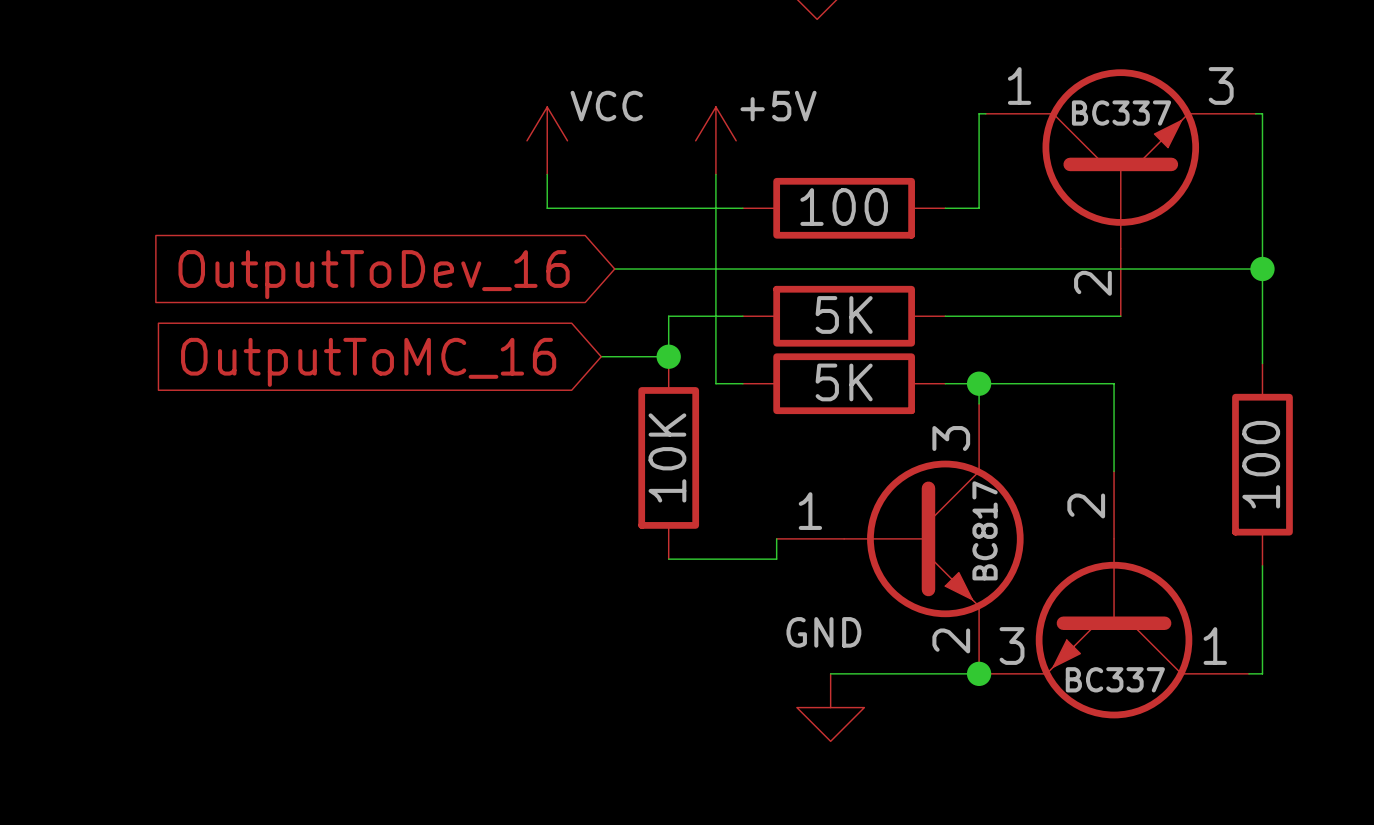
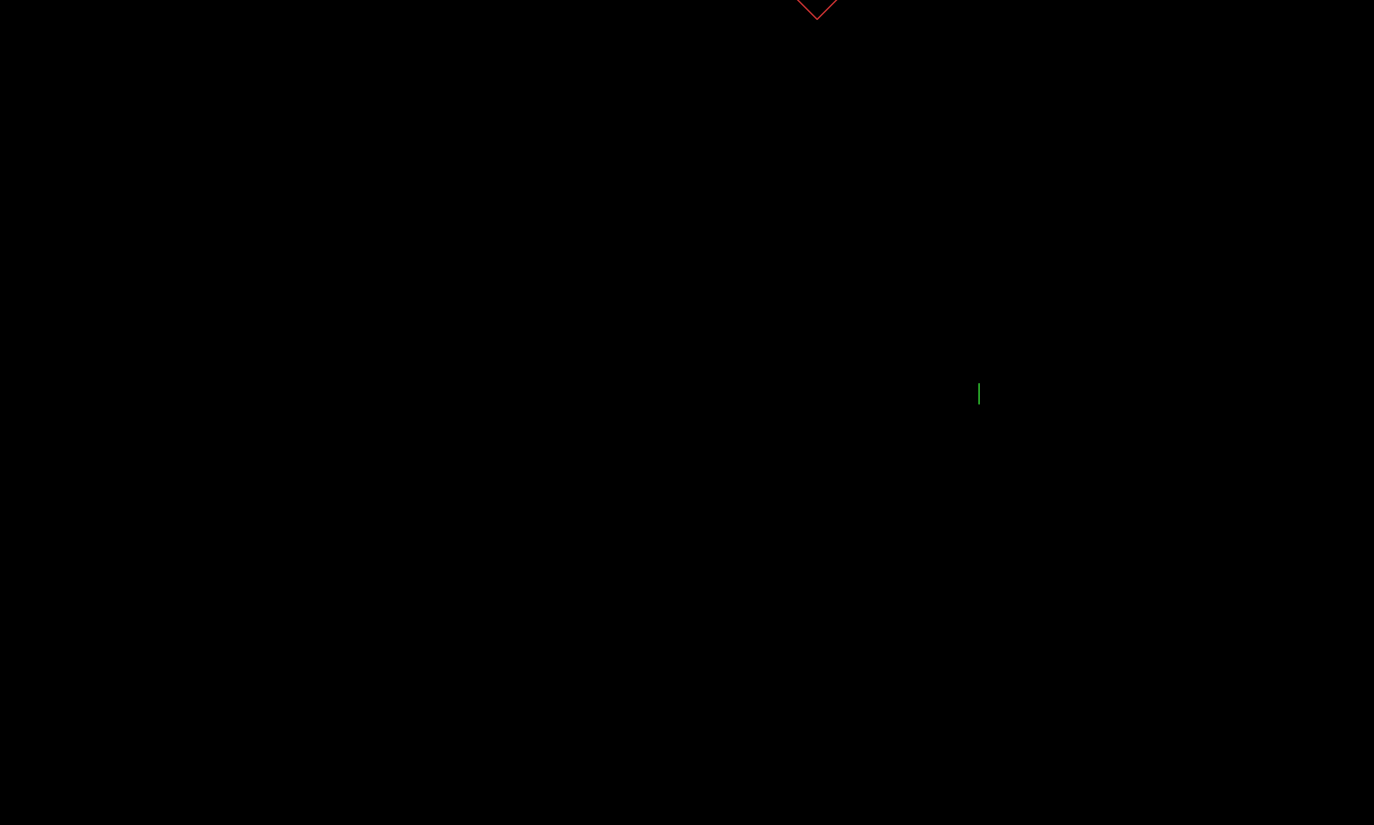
wire: (985, 113) (979, 113) (979, 208) (945, 208) -> none
wire: (1255, 113) (1262, 113) (1262, 363) -> none
power symbol: VCC (547, 140) -> none
power symbol: +5V (715, 140) -> none
wire: (547, 174) (547, 208) (742, 208) -> none
wire: (715, 174) (715, 383) (742, 383) -> none
part: BC337 (1120, 192) -> none
part: 100 (844, 208) -> none
wire: (614, 269) (1262, 269) -> none
junction: (1262, 269) -> none
global label: OutputToDev_16 (374, 274) -> none
wire: (742, 316) (668, 316) (668, 356) (601, 356) -> none
part: 5K (844, 316) -> none
wire: (945, 316) (1120, 316) -> none
junction: (668, 356) -> none
global label: OutputToMC_16 (368, 362) -> none
part: 5K (844, 383) -> none
wire: (945, 383) (1114, 383) (1114, 471) -> none
junction: (979, 383) -> none
part: 10K (668, 457) -> none
part: 100 (1262, 464) -> none
wire: (776, 538) (776, 559) (668, 559) -> none
part: BC817 (900, 538) -> none
wire: (1262, 565) (1262, 673) (1248, 673) -> none
part: BC337 (1114, 594) -> none
wire: (830, 673) (979, 673) -> none
junction: (979, 673) -> none
power symbol: GND (830, 707) -> none

